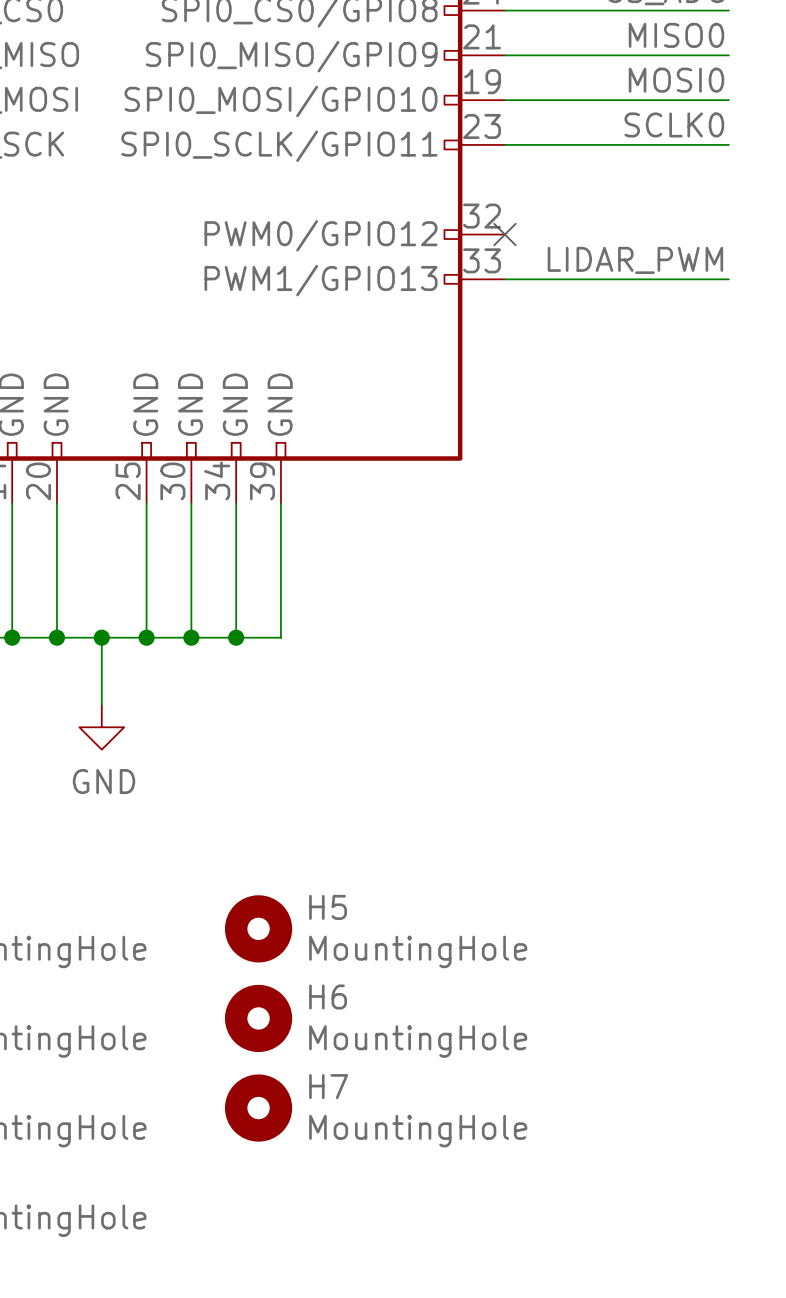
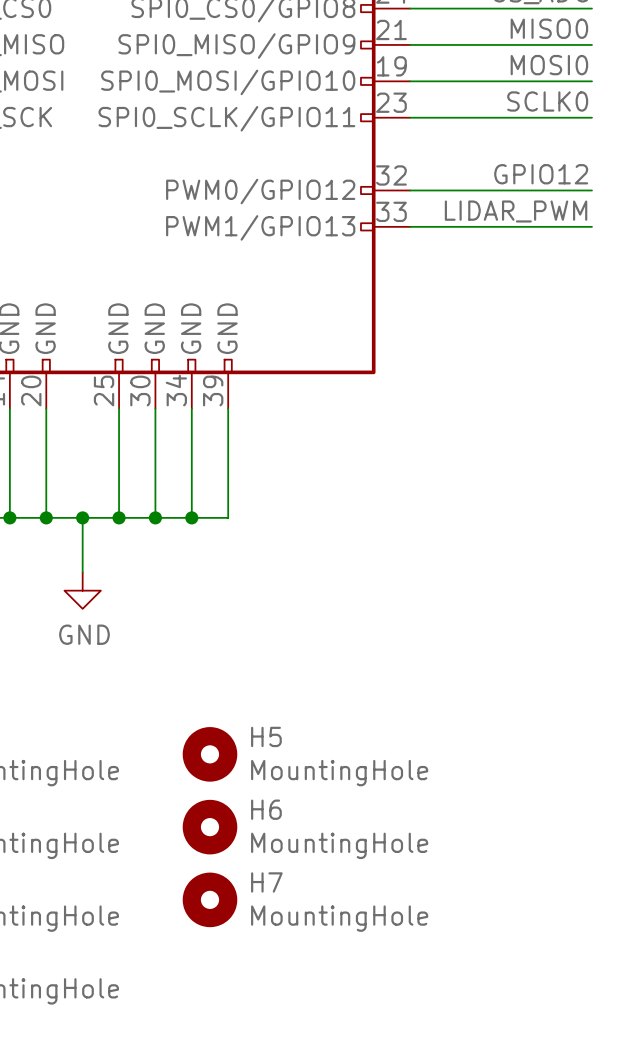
label: none -> GPIO12 (541, 174)
wire: none -> (410, 190) (591, 190)
no-connect mark: (504, 234) -> none

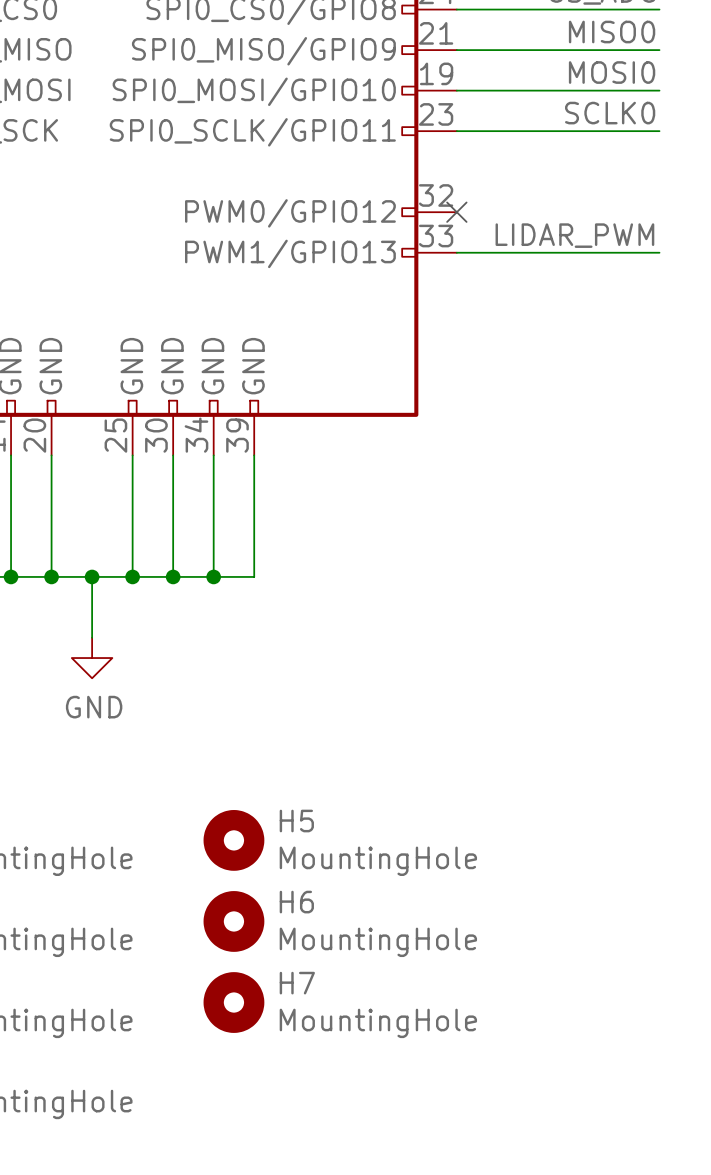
label: GPIO12 (541, 174) -> none
wire: (410, 190) (591, 190) -> none
no-connect mark: none -> (456, 212)

